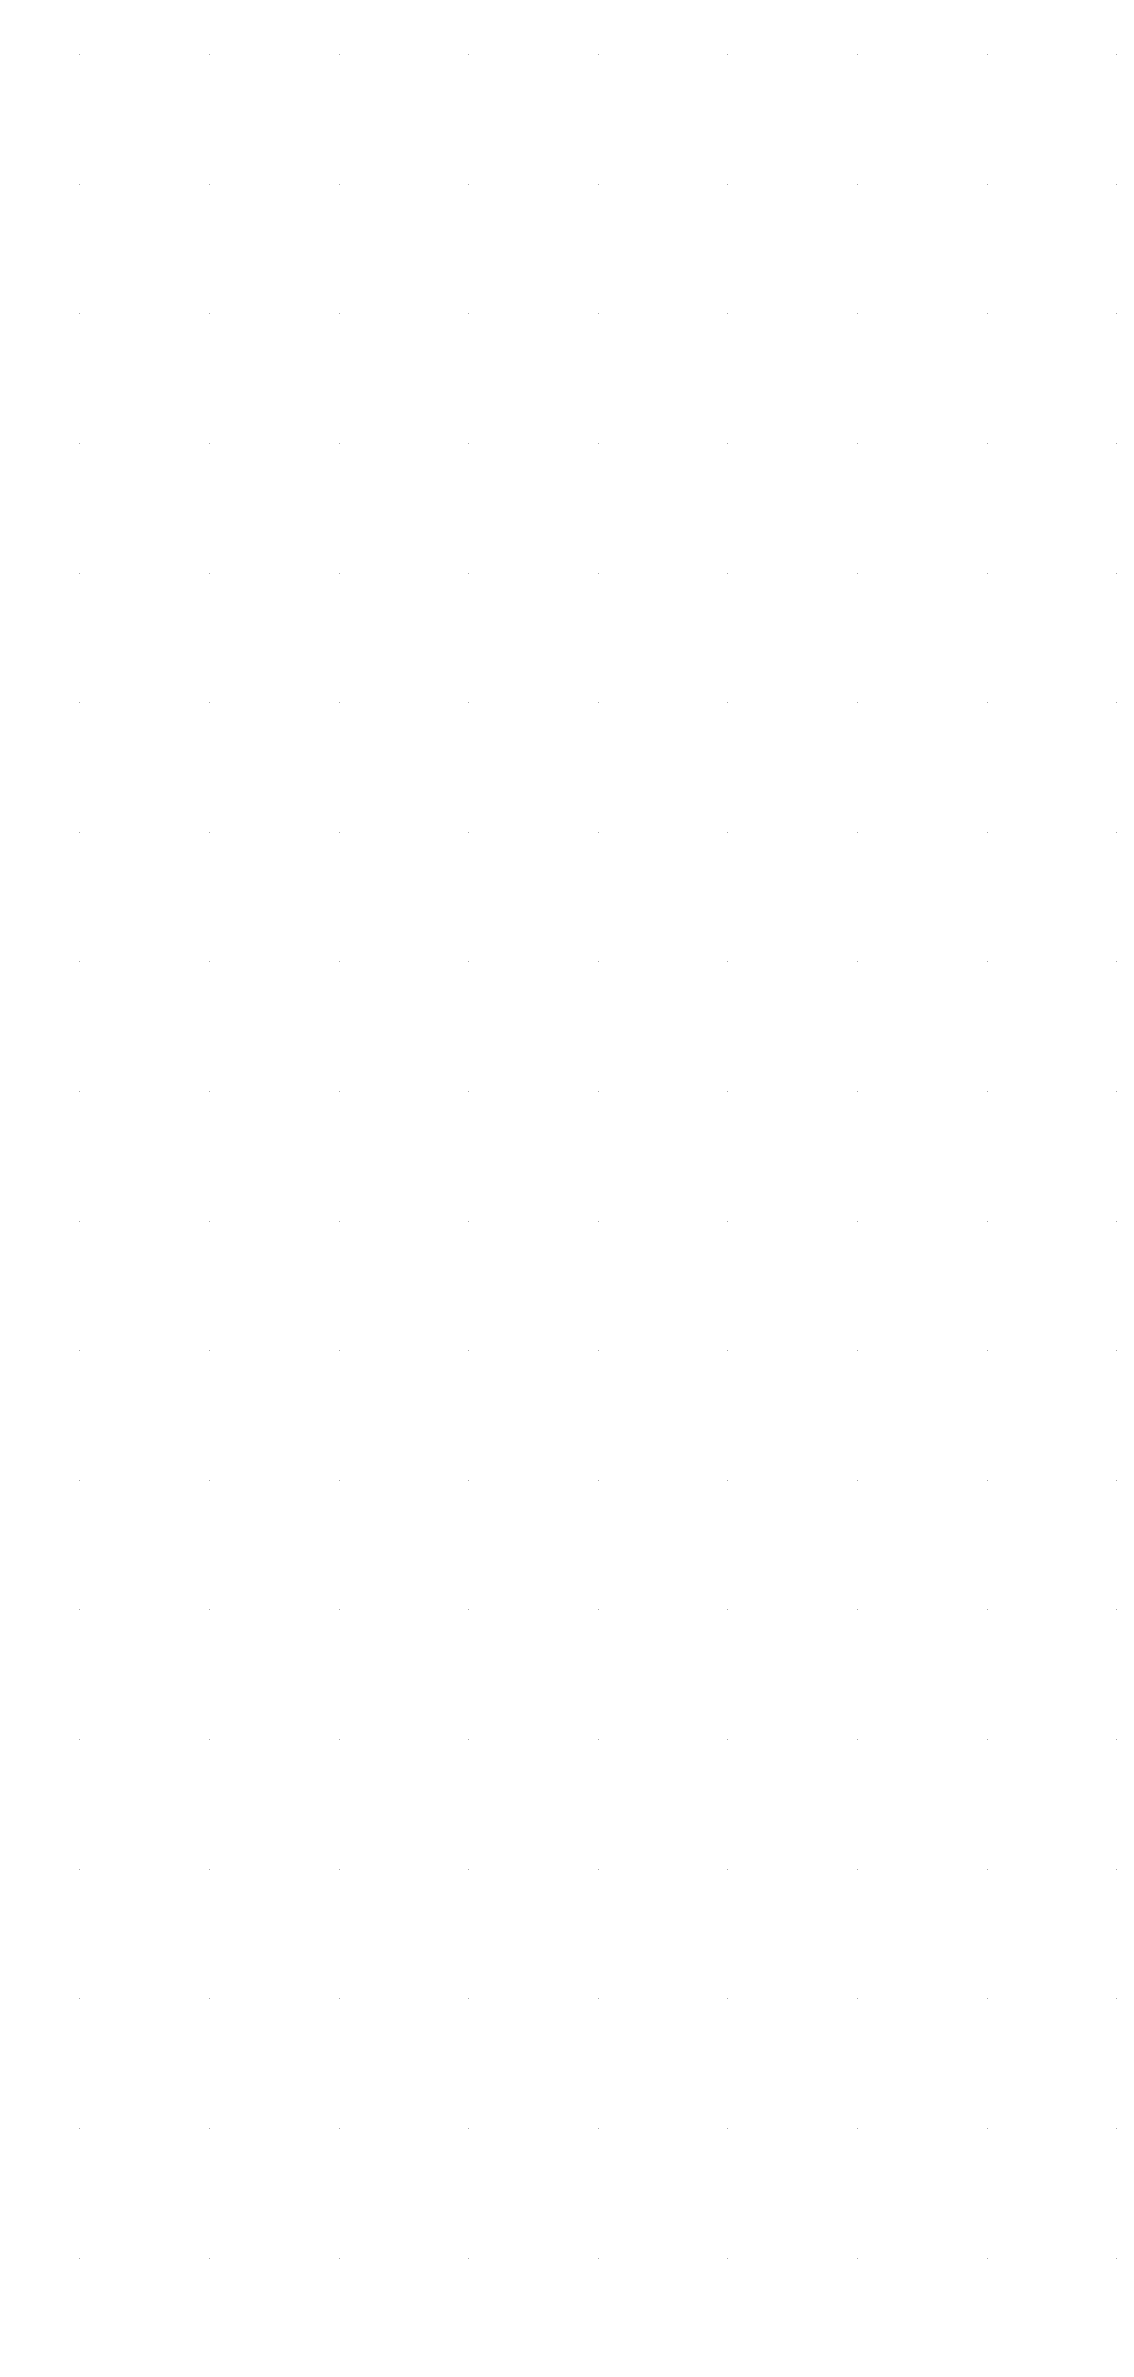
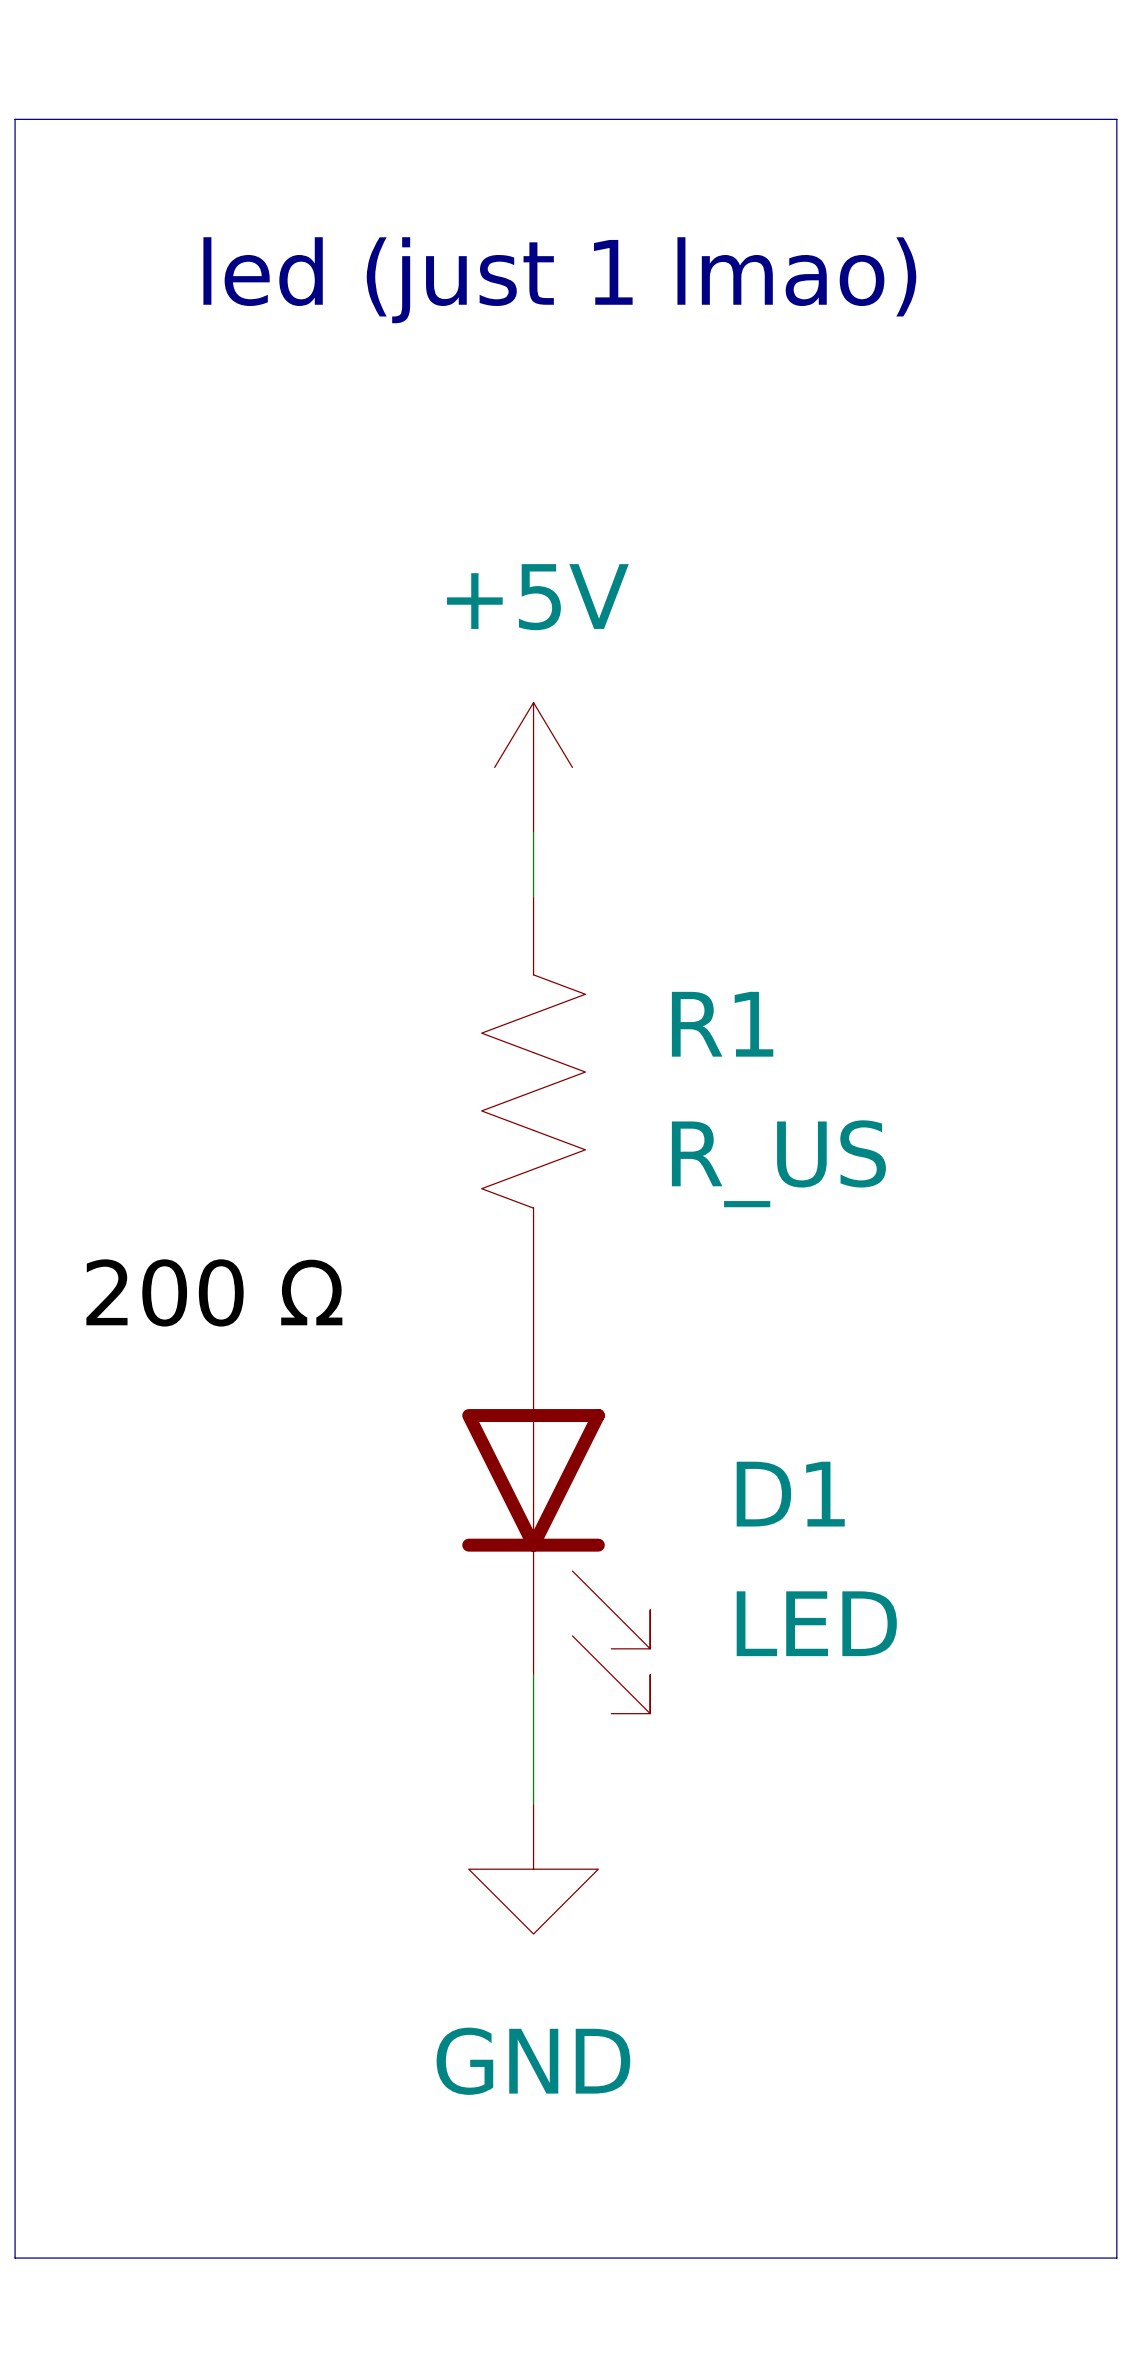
line: none -> (15, 119) (1116, 119) (1116, 2258) (15, 2258) (15, 119)
text: none -> led (just 1 lmao) (559, 280)
power symbol: none -> +5V (533, 767)
wire: none -> (533, 832) (533, 897)
R1: none -> R_US (533, 1091)
label: none -> 200 Ω (214, 1292)
D1: none -> LED (556, 1499)
wire: none -> (533, 1674) (533, 1804)
power symbol: none -> GND (533, 1869)

